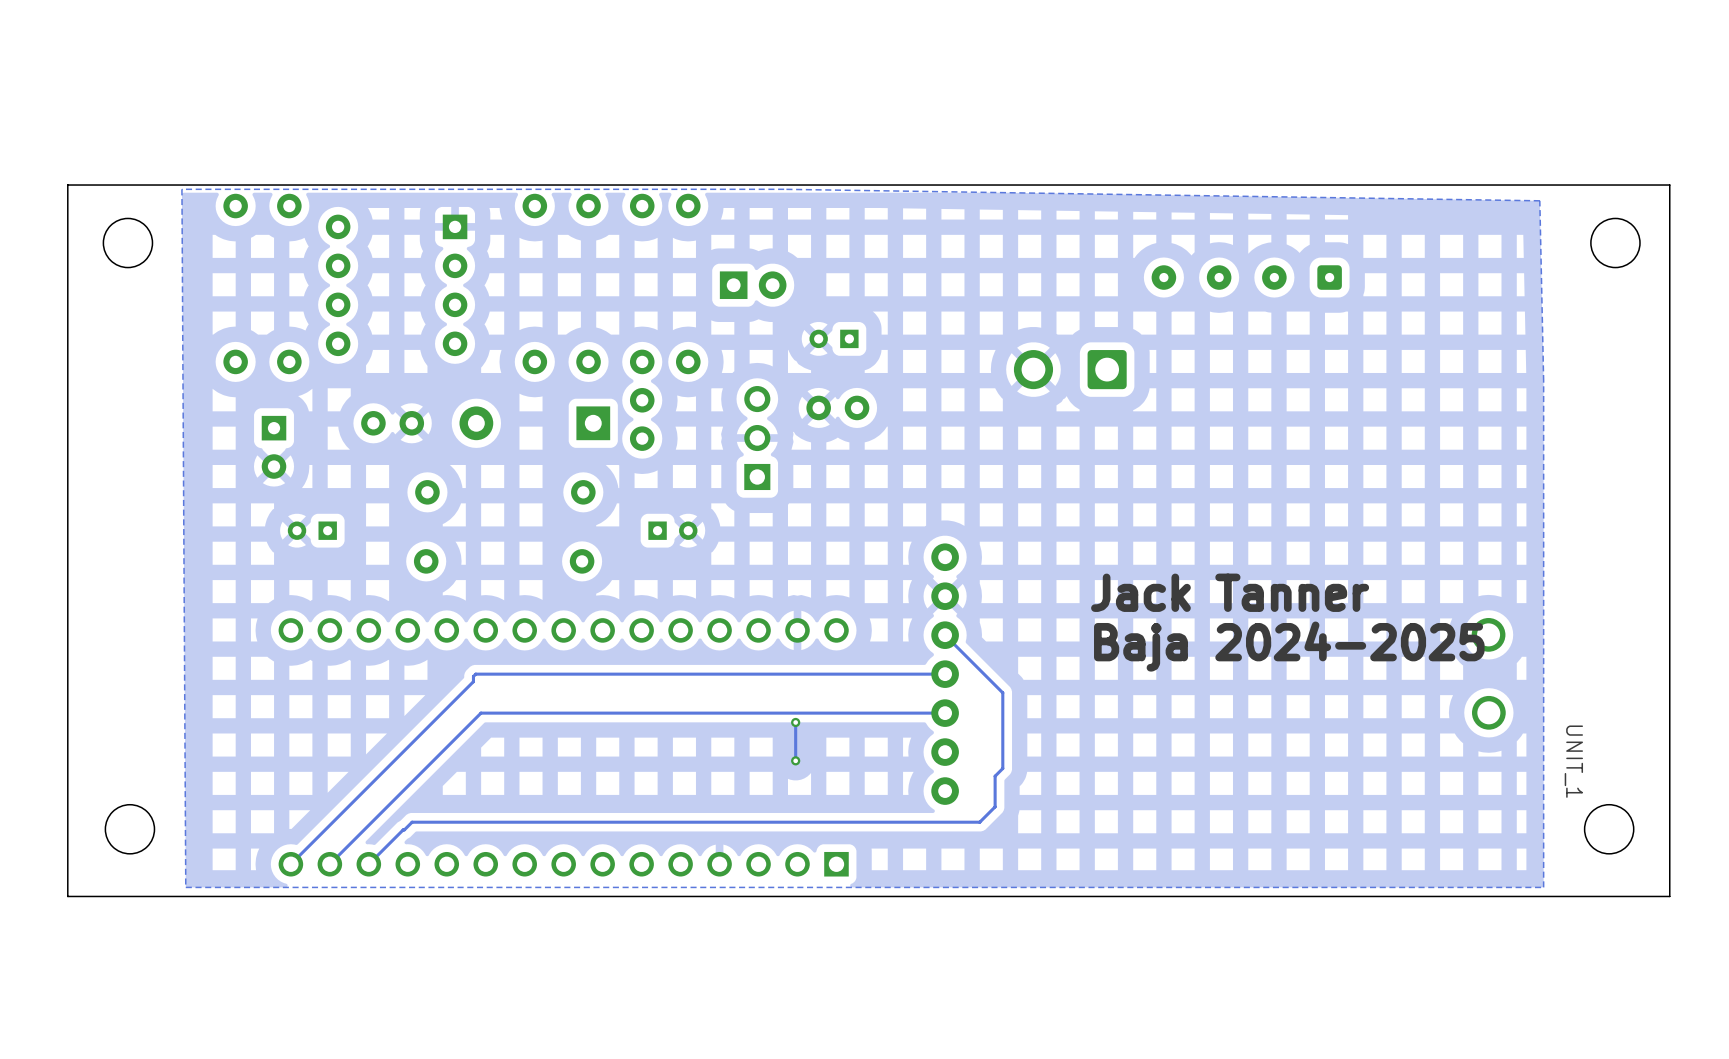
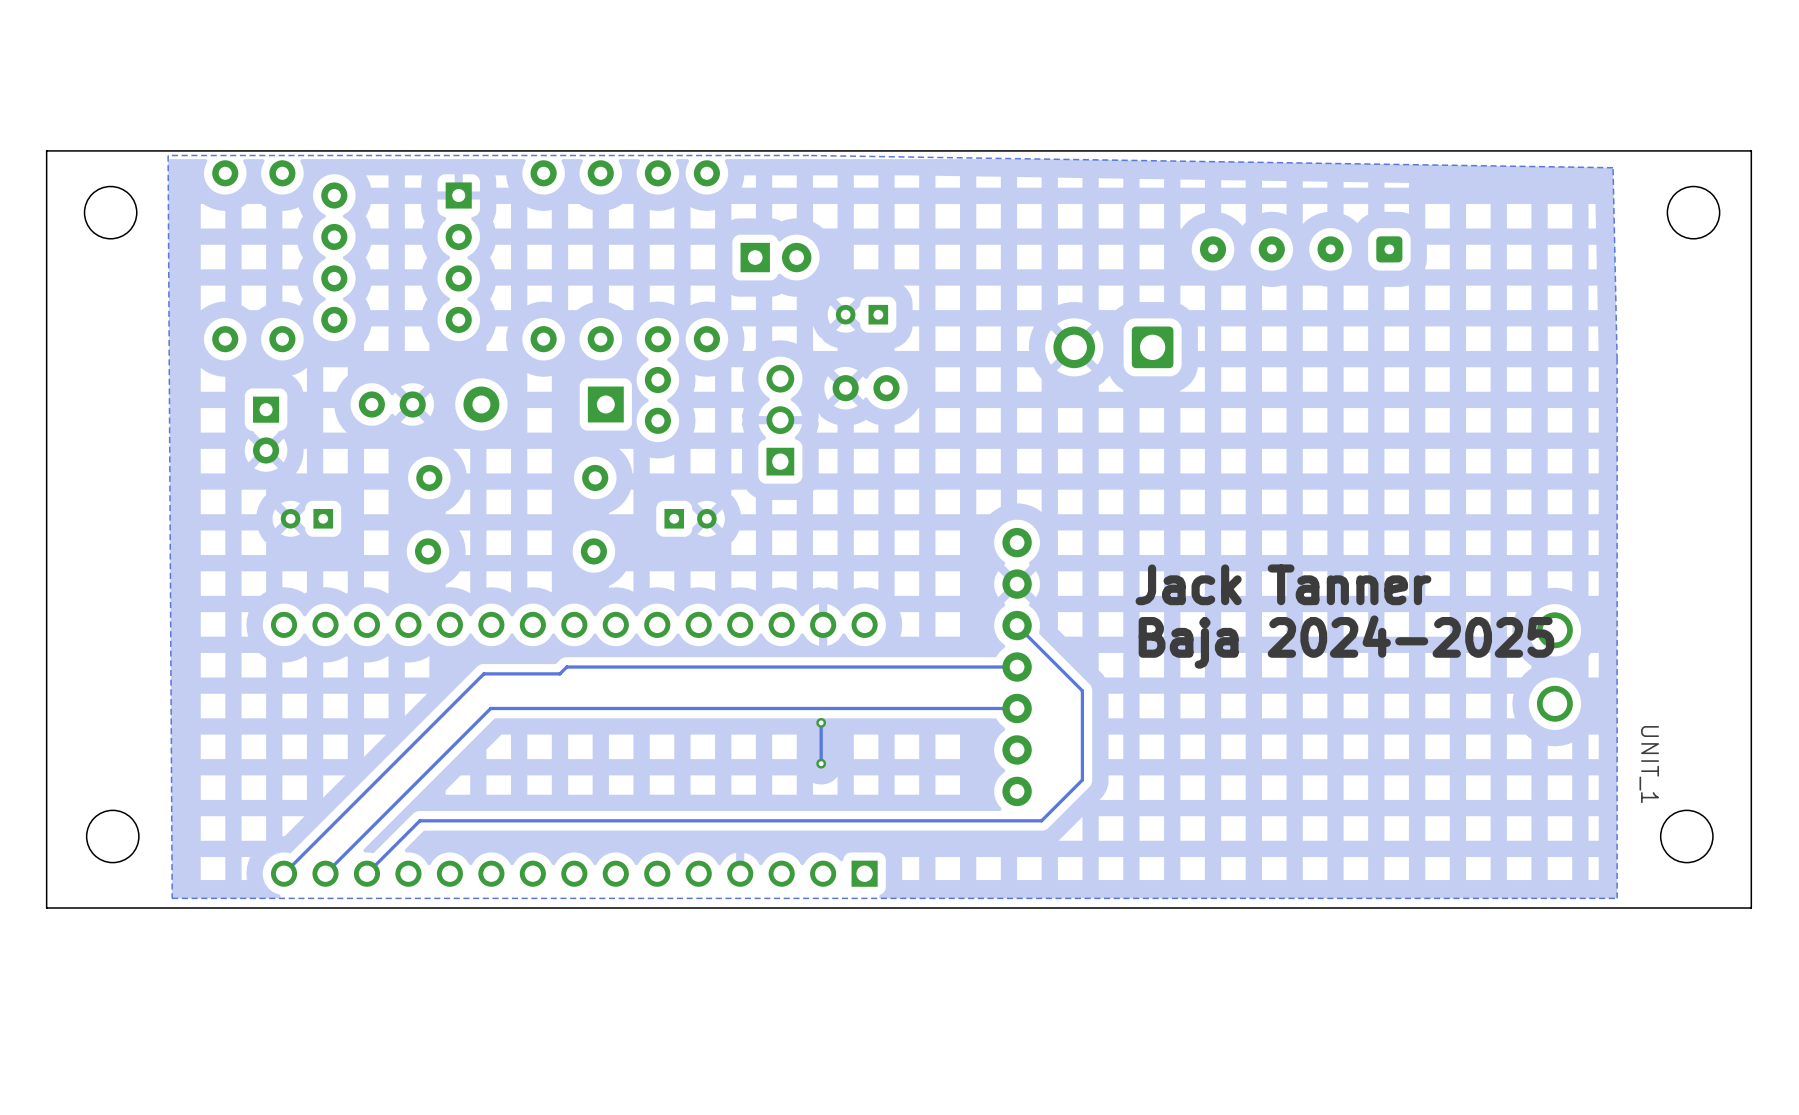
UNIT_1 footprint: [931, 543, 1506, 805] -> [1002, 527, 1573, 807]
track: (945, 635) (1002, 692) (1002, 768) (995, 776) (995, 806) (979, 822) (412, 822) (403, 829) -> (1017, 625) (1082, 690) (1082, 780) (1041, 820) (419, 820) (403, 837)
track: (945, 674) (475, 674) (473, 676) (473, 681) -> (1017, 667) (566, 667) (559, 673) (483, 673) (478, 679)
track: (945, 713) (480, 713) -> (1017, 708) (490, 708) (486, 712)

